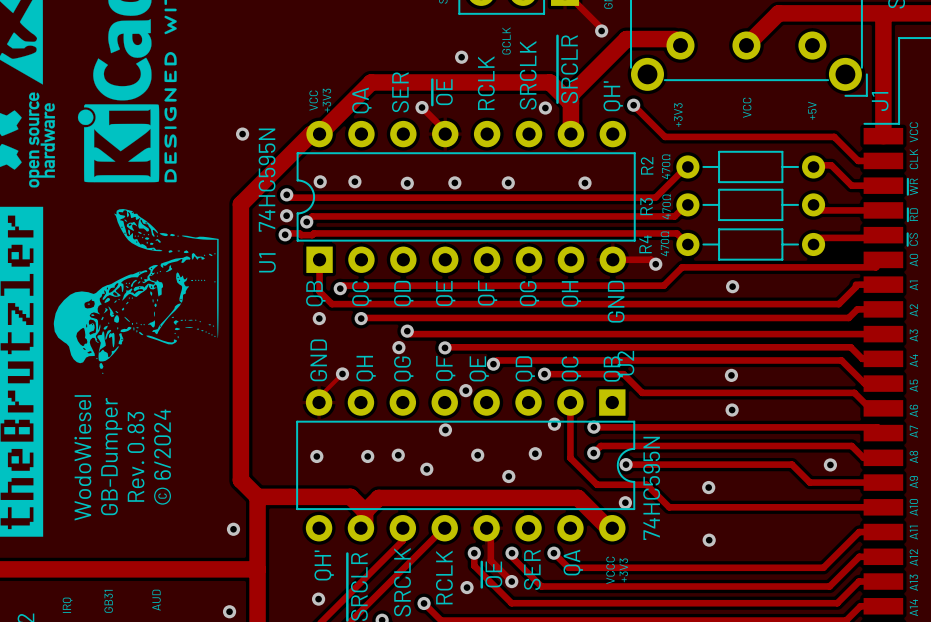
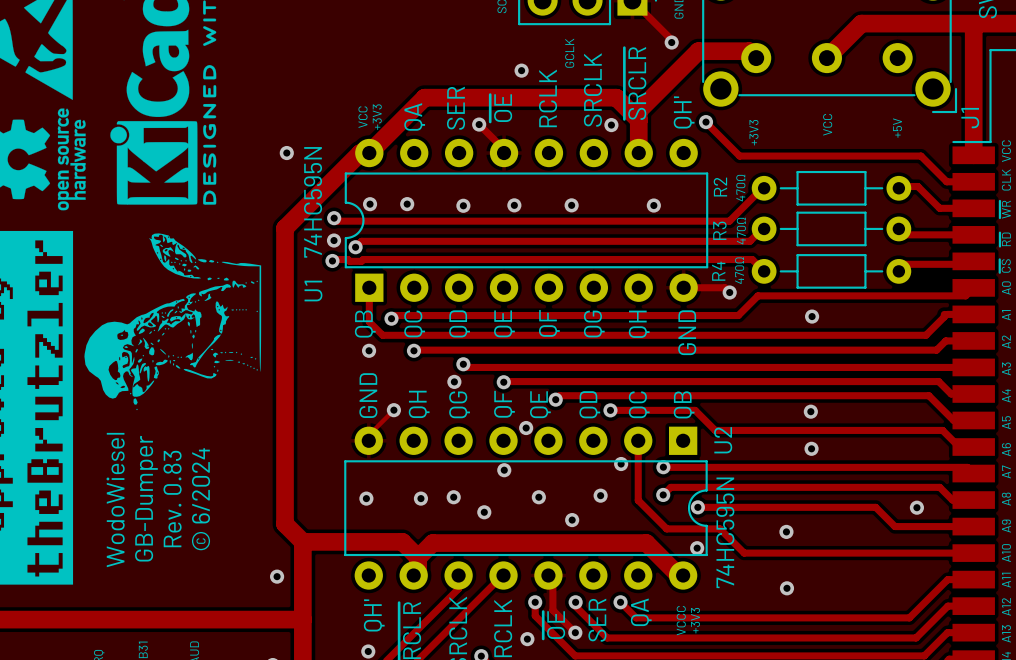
U2 name position: U2 (625, 363) -> U2 (723, 440)

